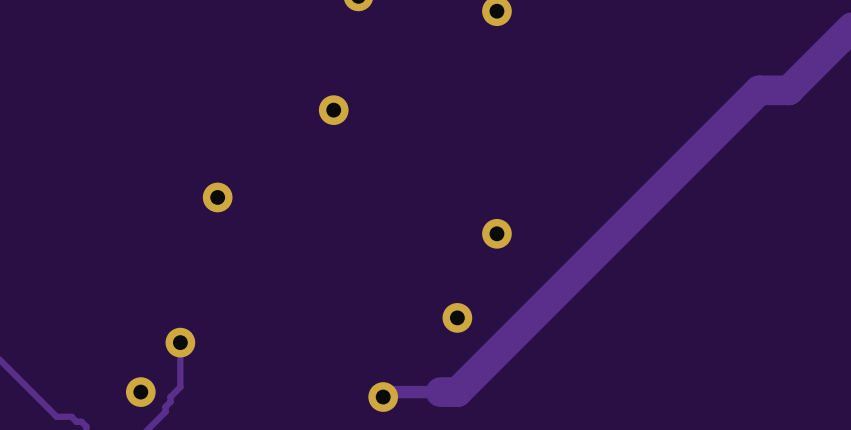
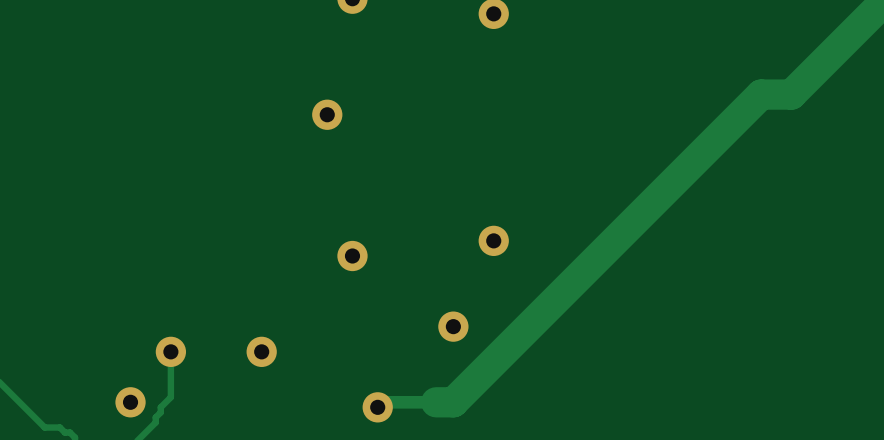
via: (217, 197) -> none
via: none -> (352, 256)
via: none -> (261, 351)

